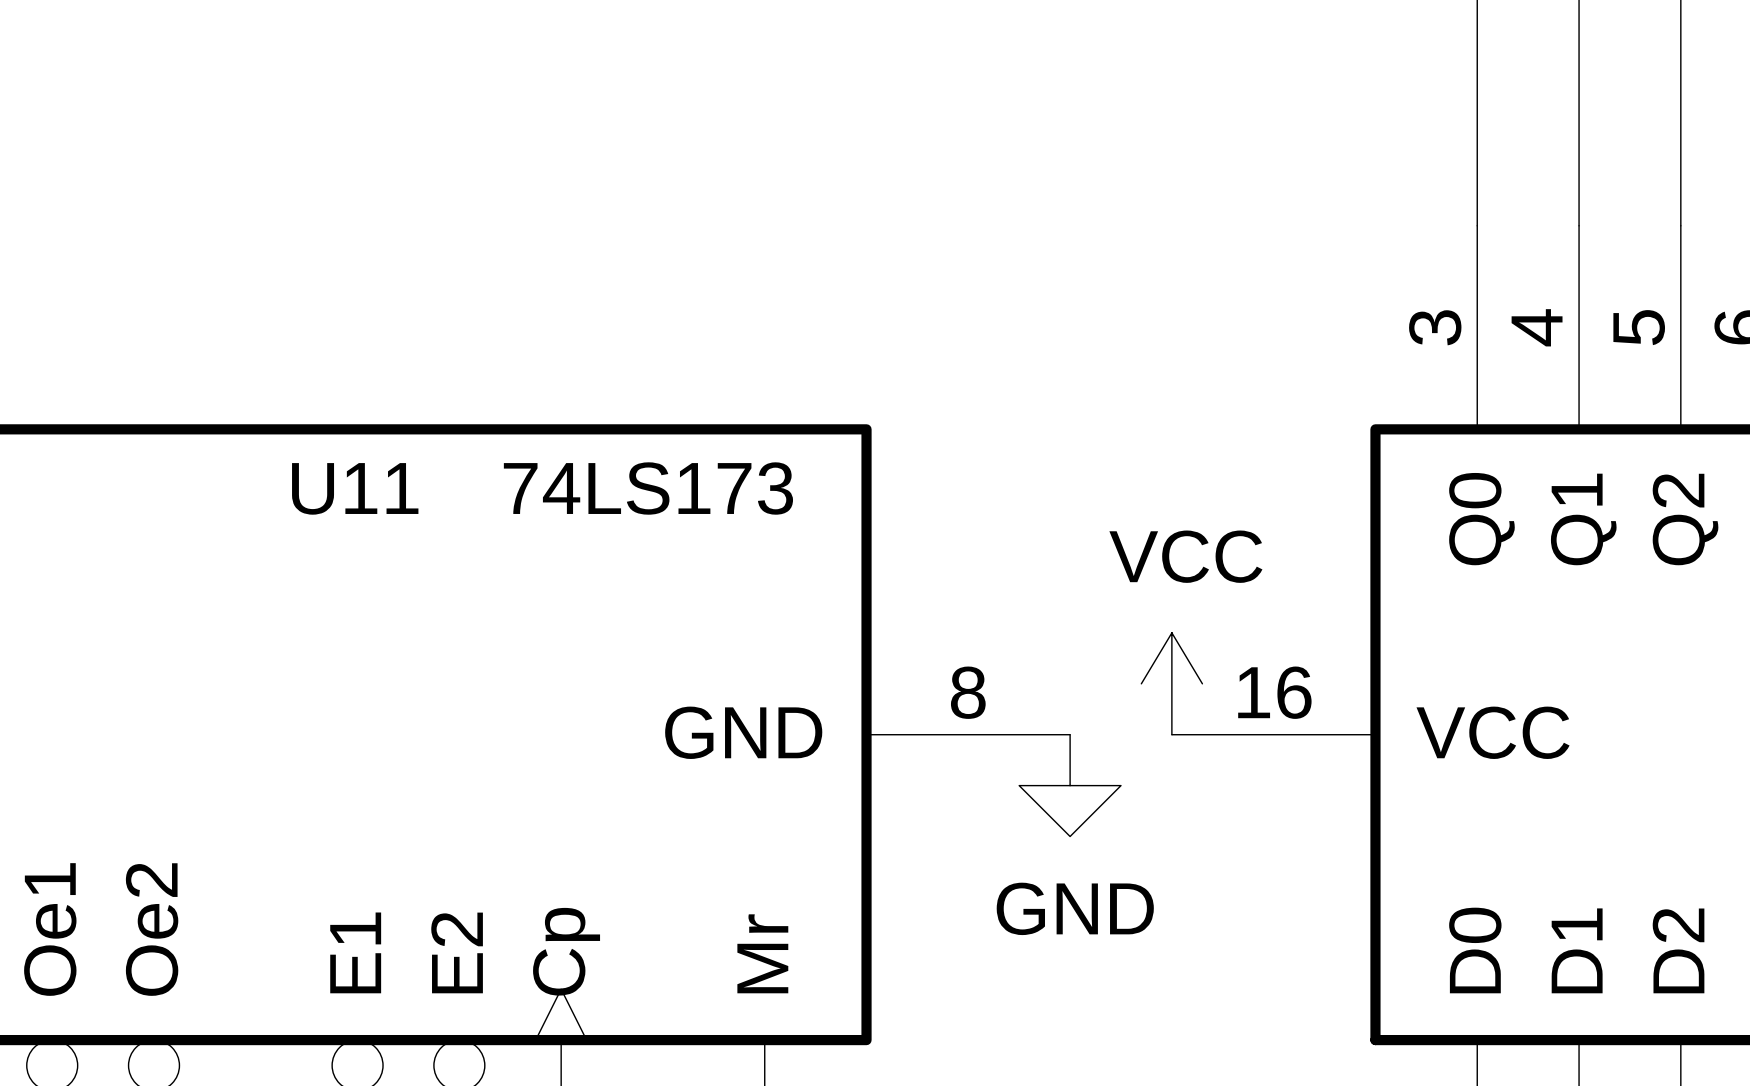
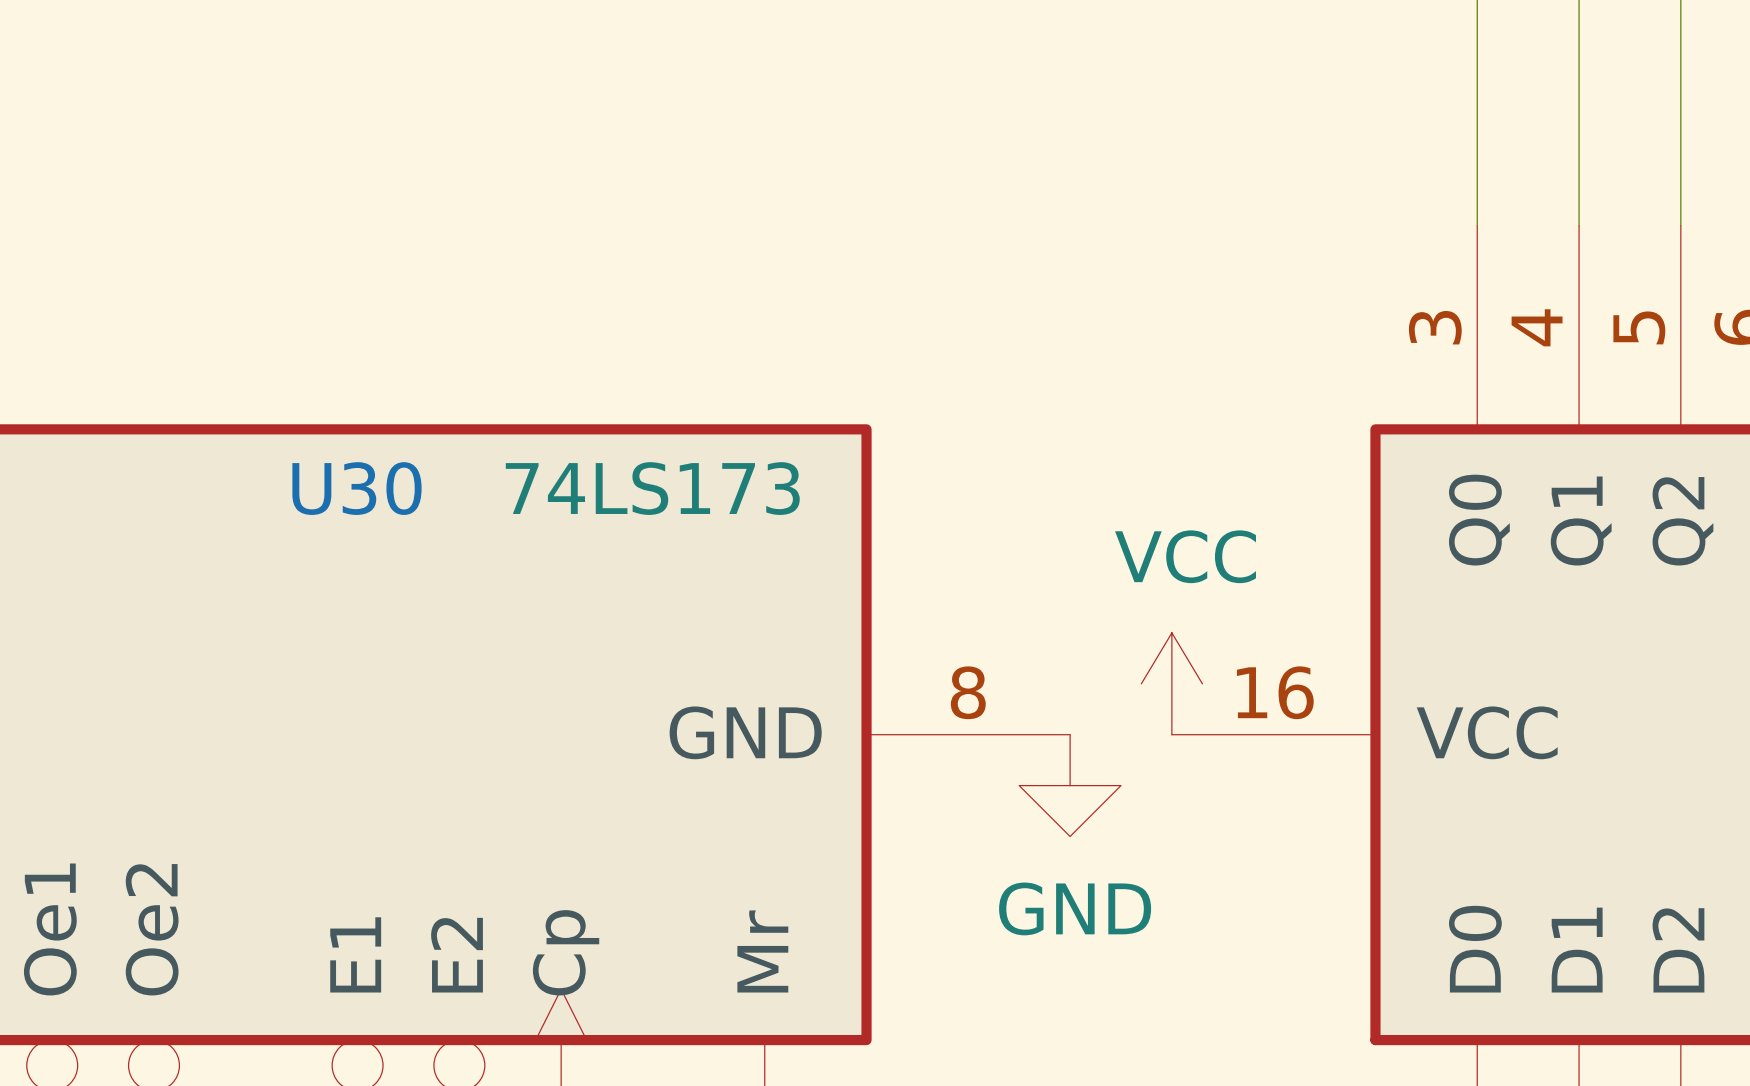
U11 name: U11 (355, 488) -> U30 (357, 488)

